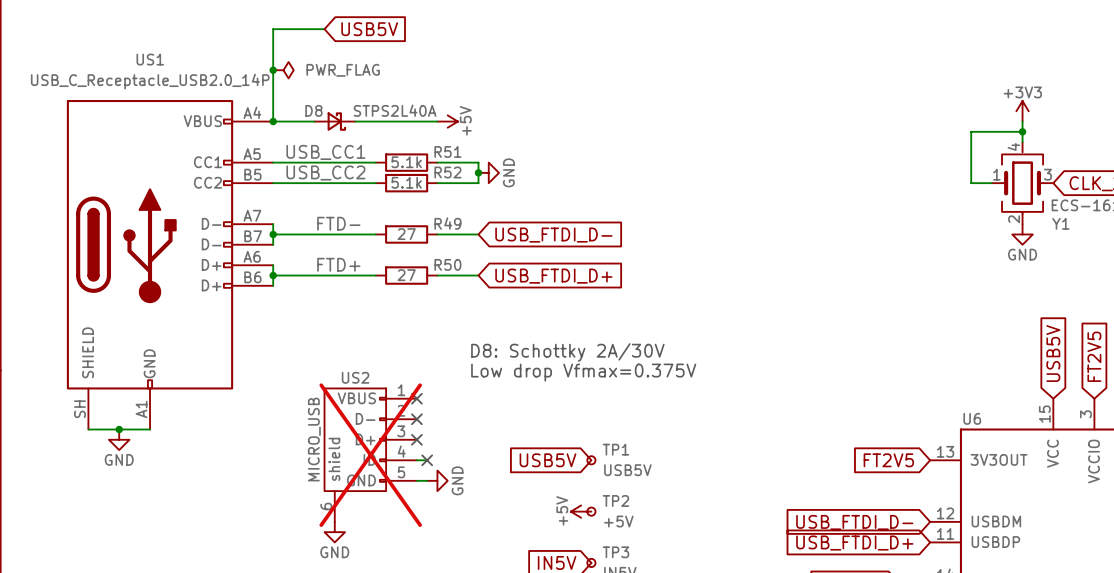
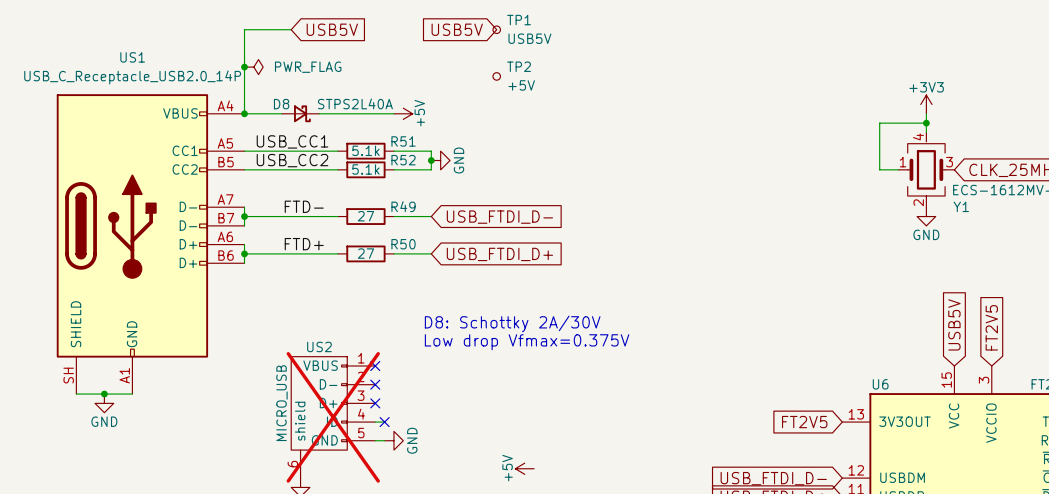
global label: none -> USB5V (457, 29)
global label: USB5V (548, 460) -> none
TP1 position: (591, 460) -> (496, 29)
TP2 position: (591, 511) -> (496, 76)

